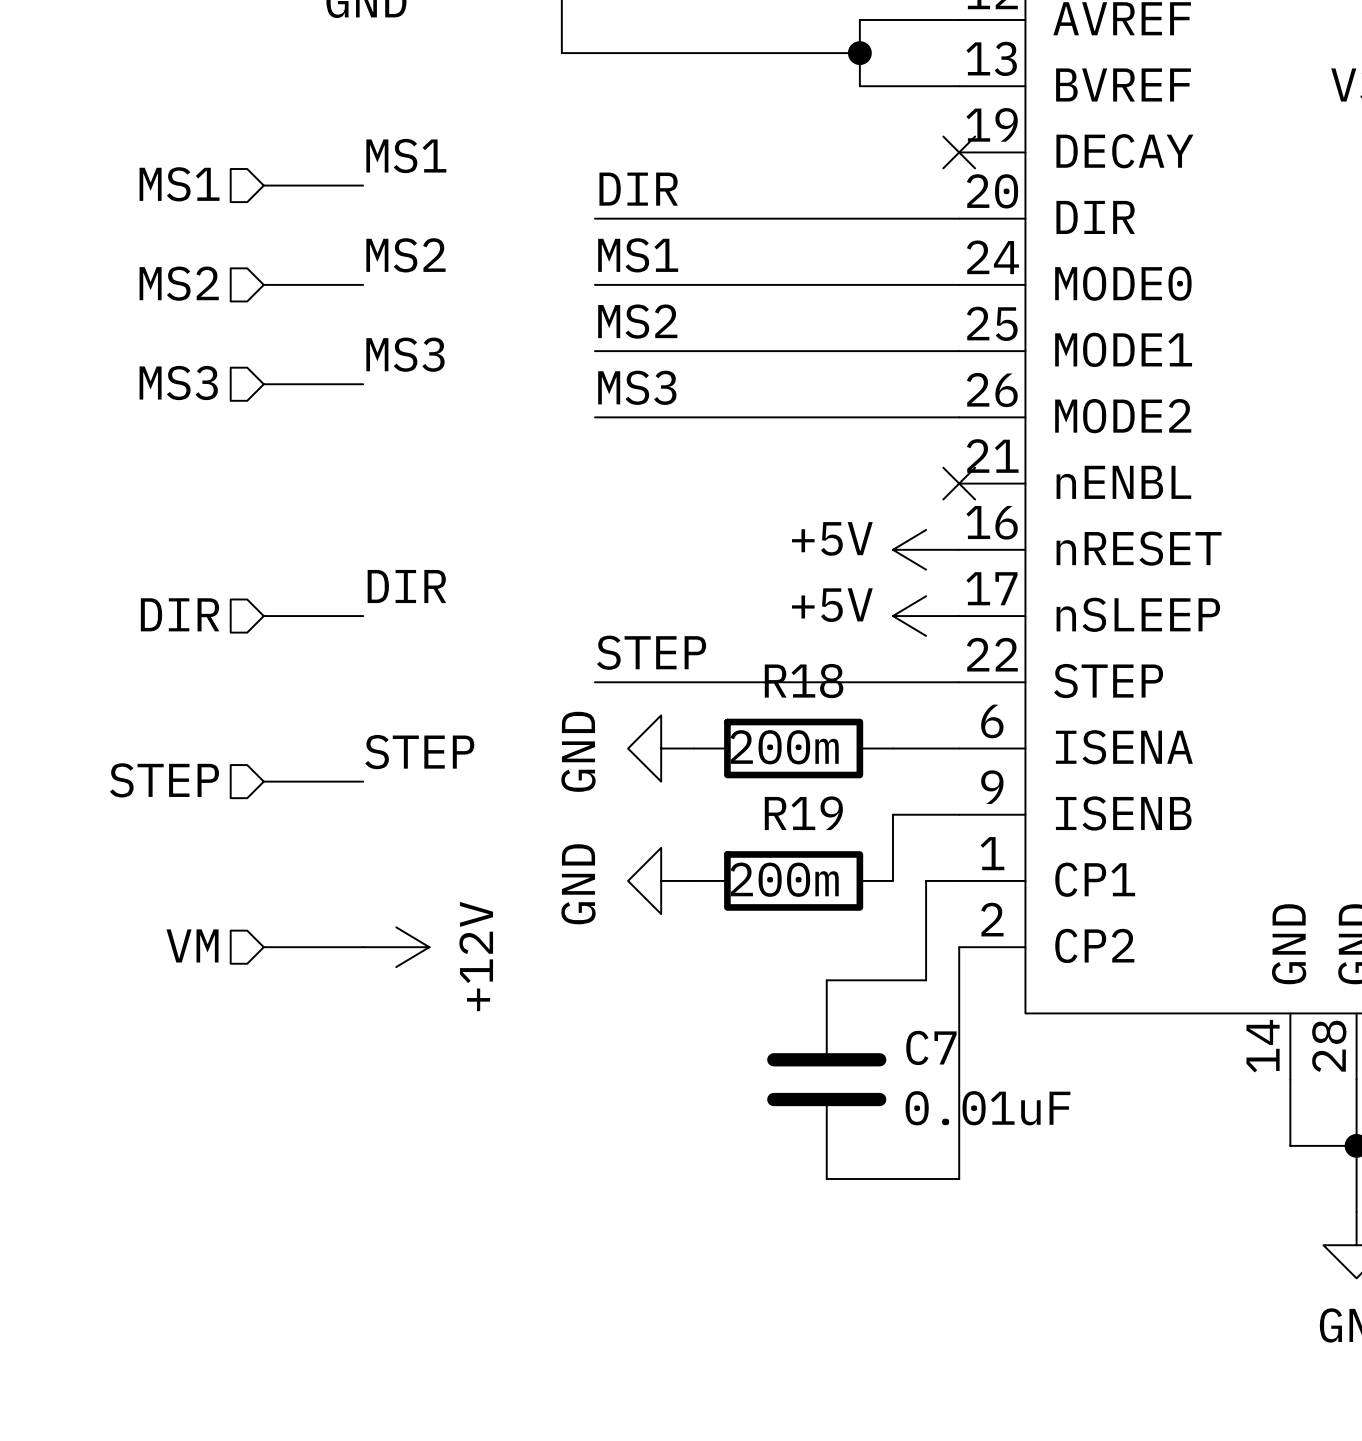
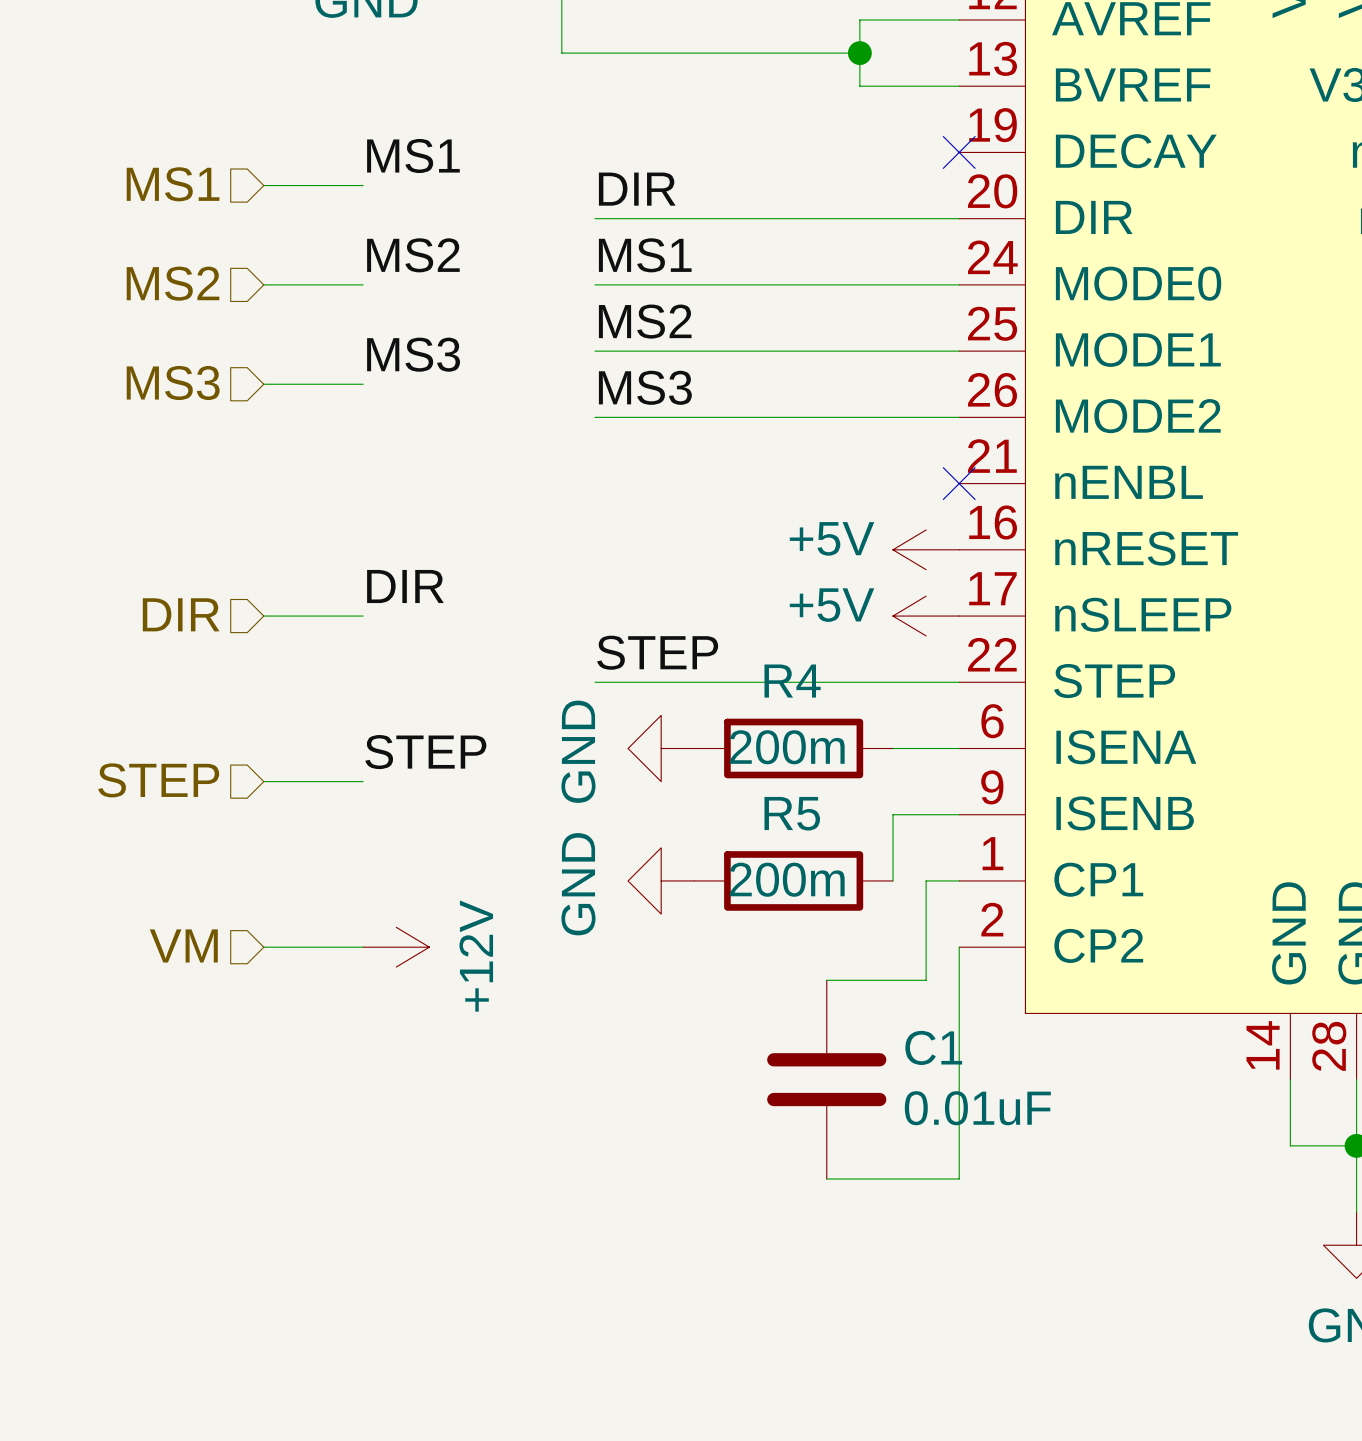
R18 name: R18 (804, 681) -> R4 (792, 681)
R19 name: R19 (803, 813) -> R5 (792, 813)
C7 name: C7 (931, 1047) -> C1 (933, 1047)

